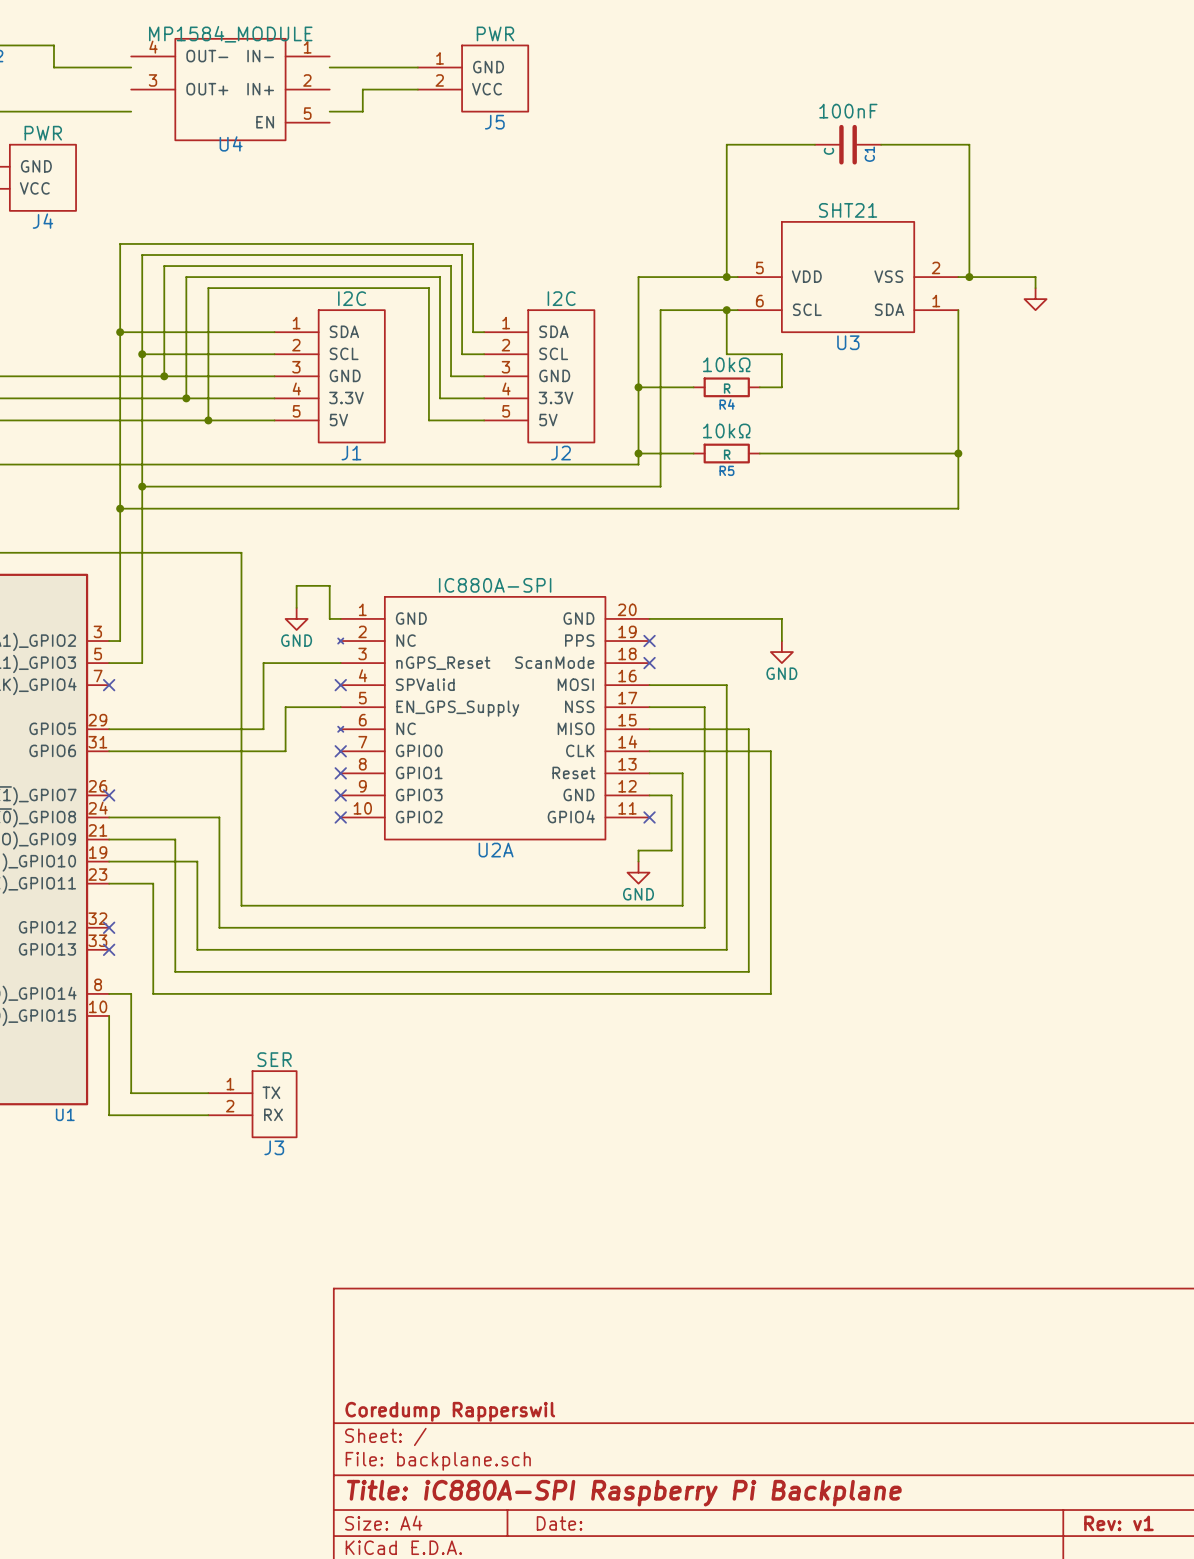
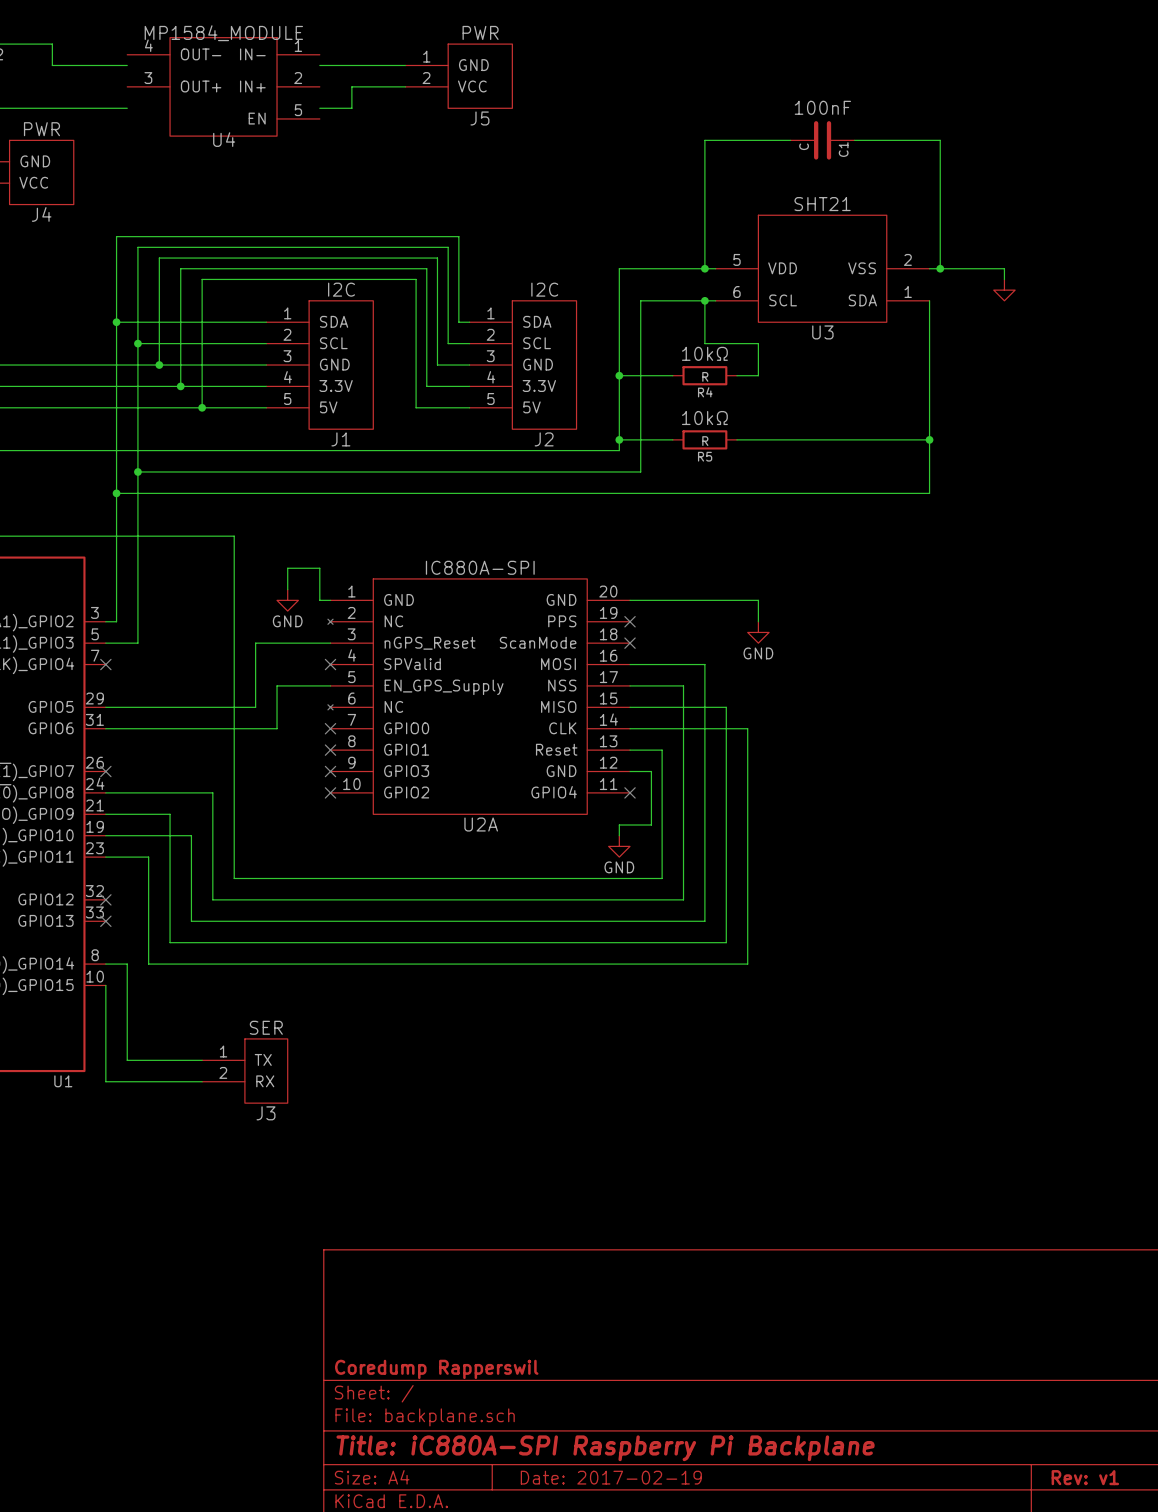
title block: Date: (559, 1523) -> Date: 2017-02-19 (611, 1477)

